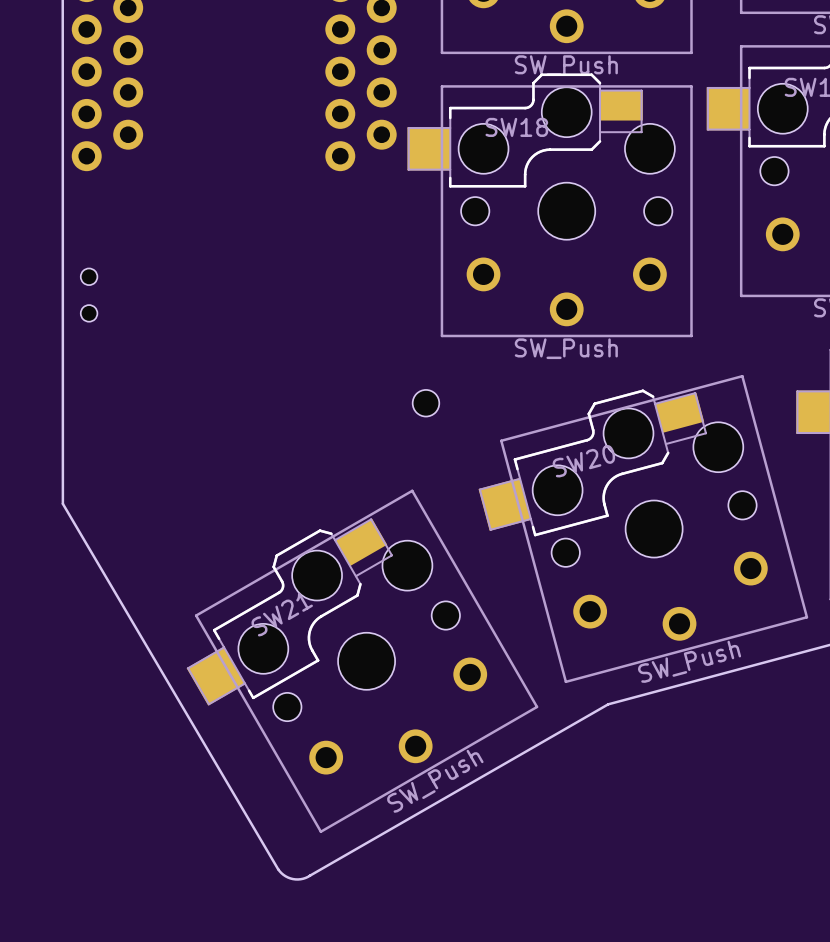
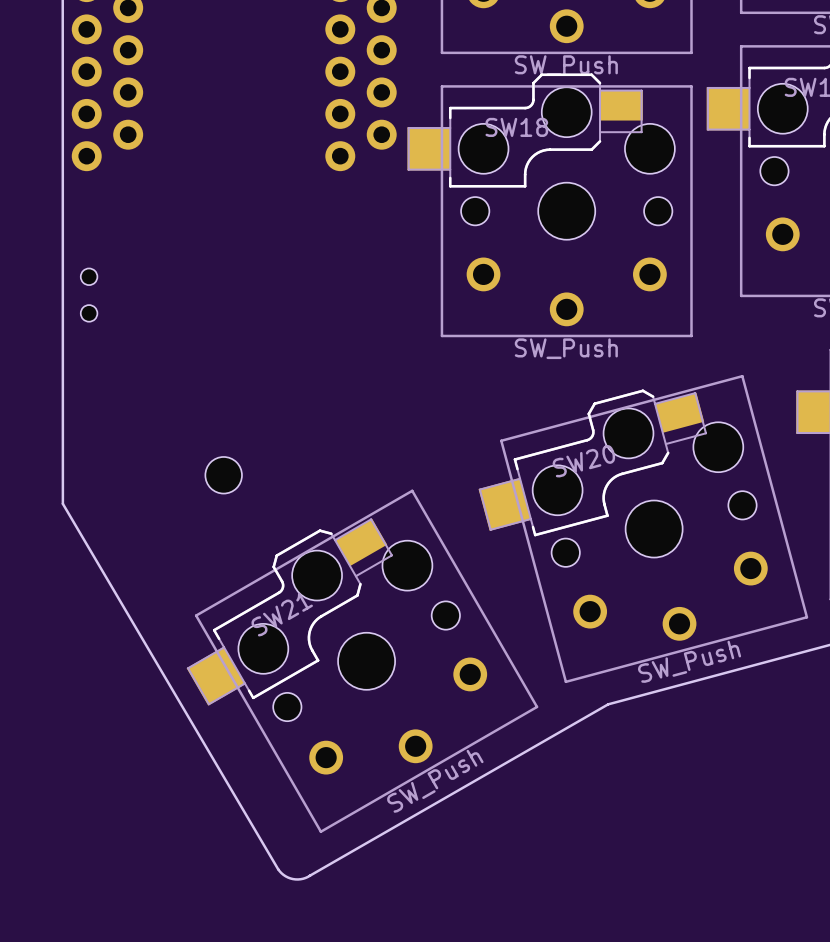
part: (425, 403) -> none
part: none -> (223, 475)

